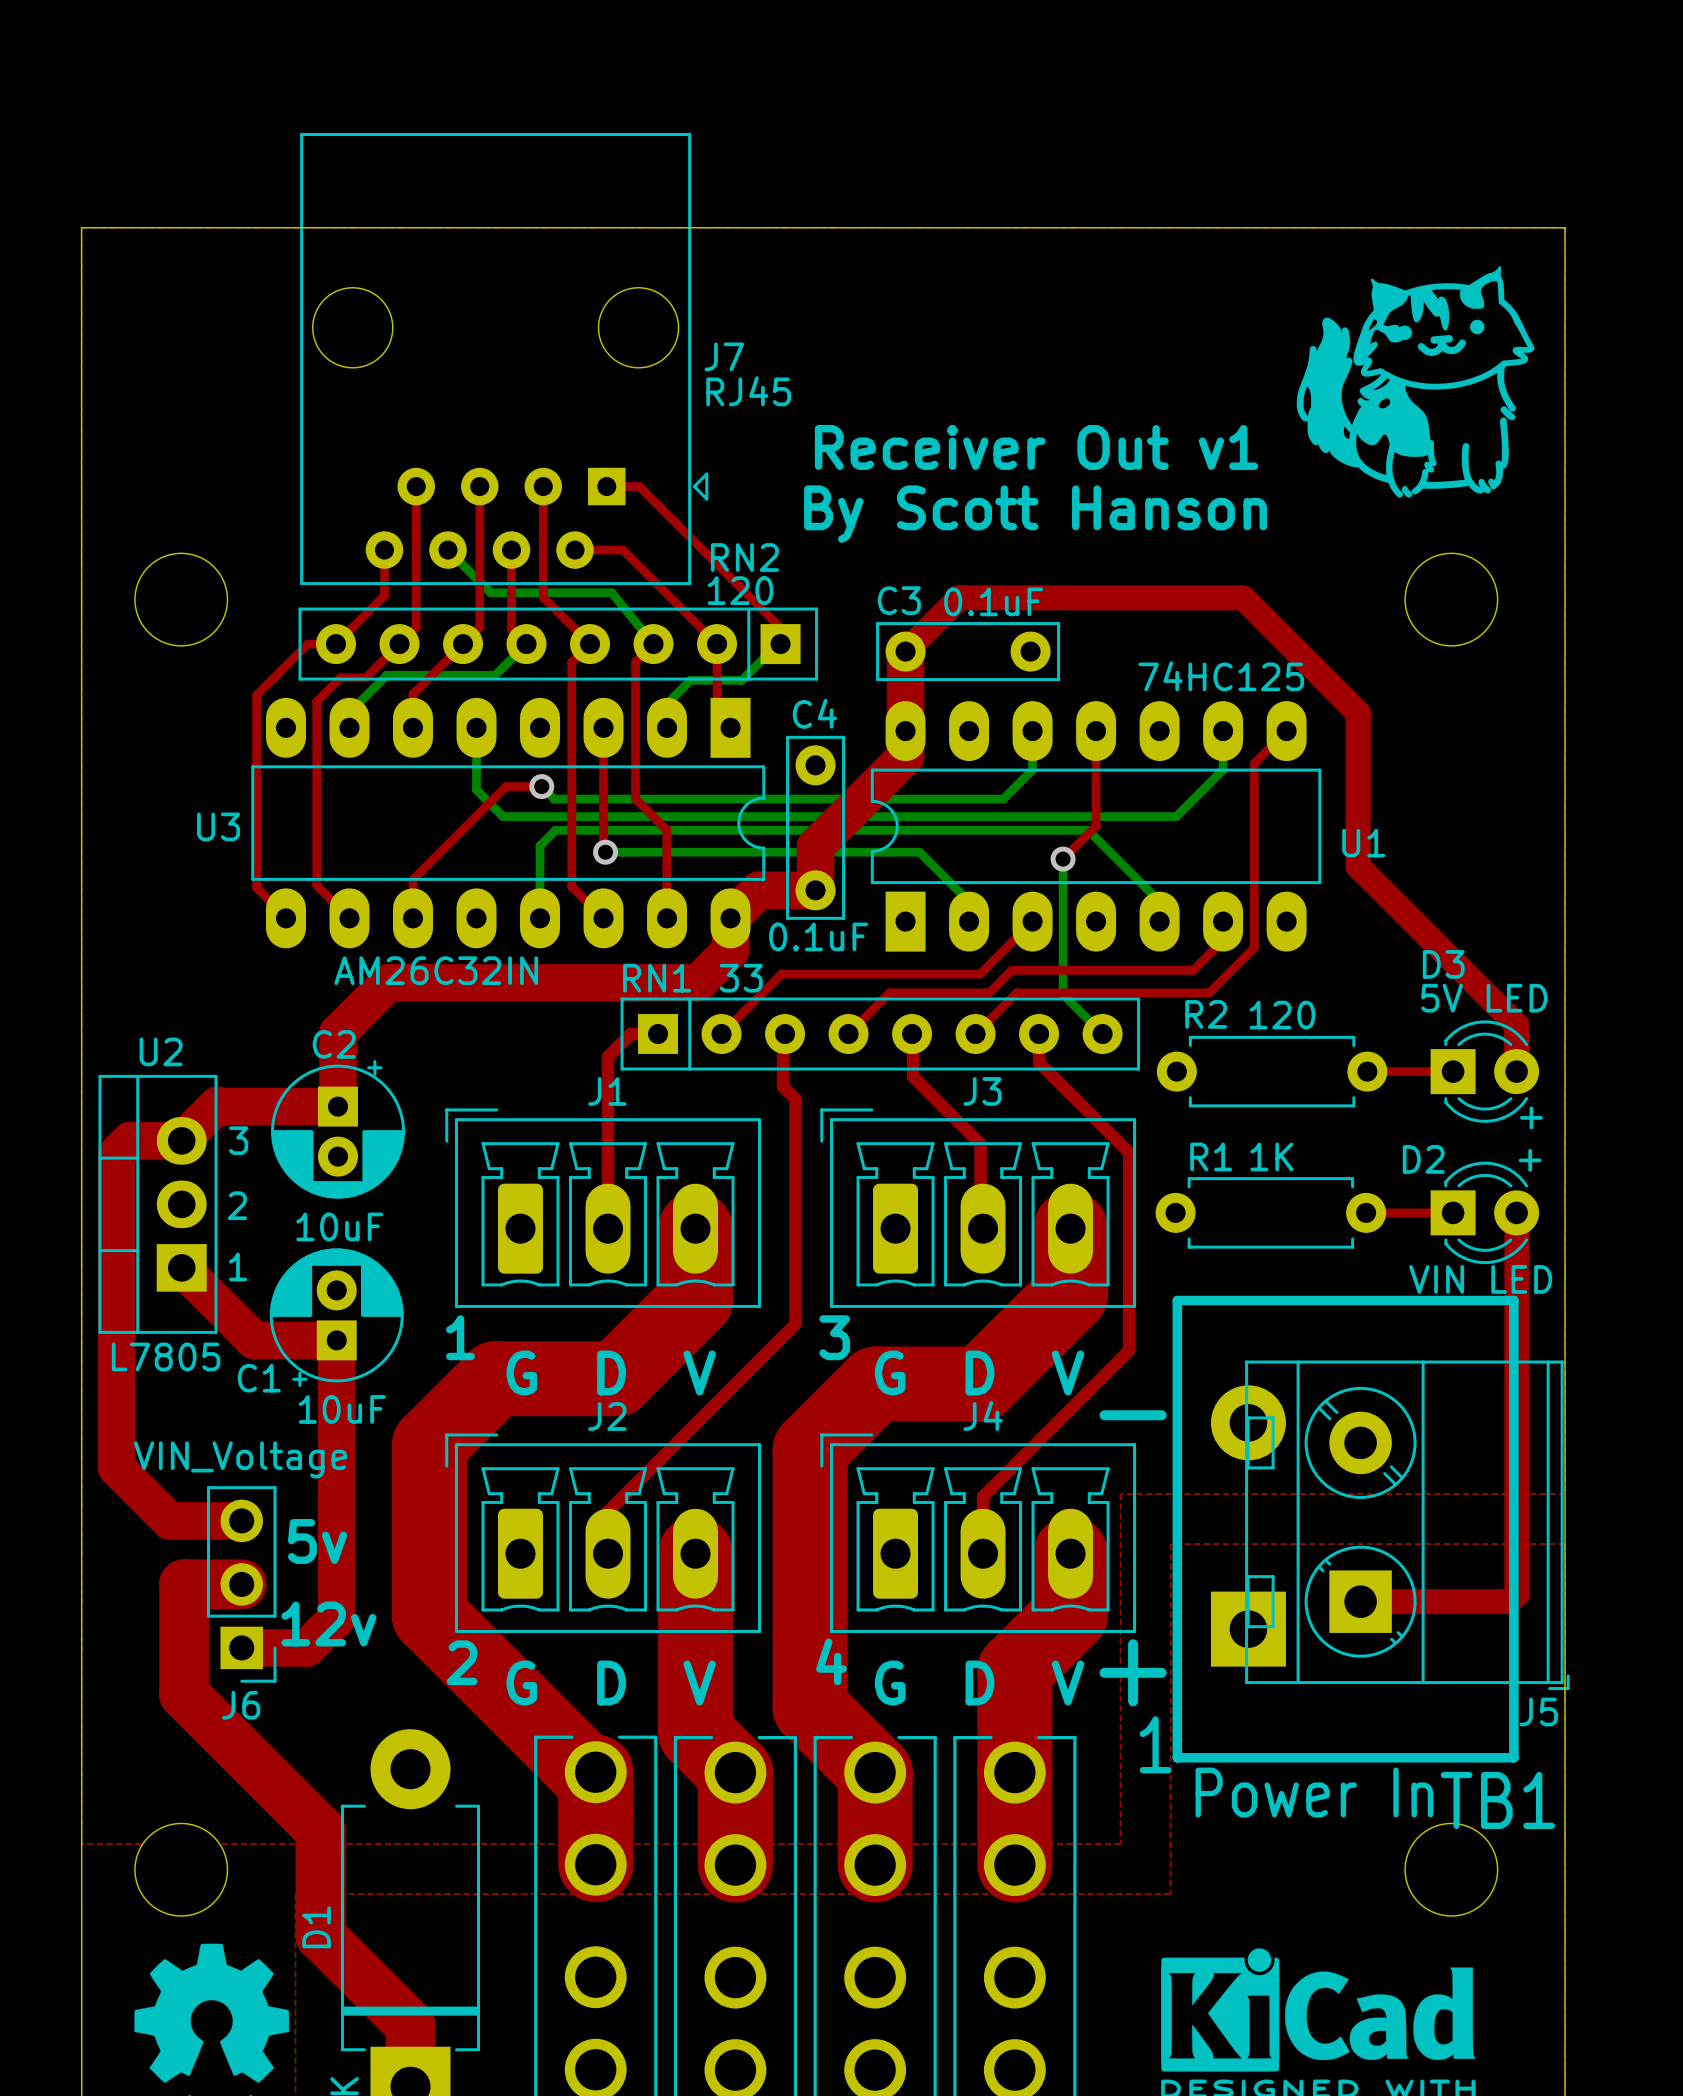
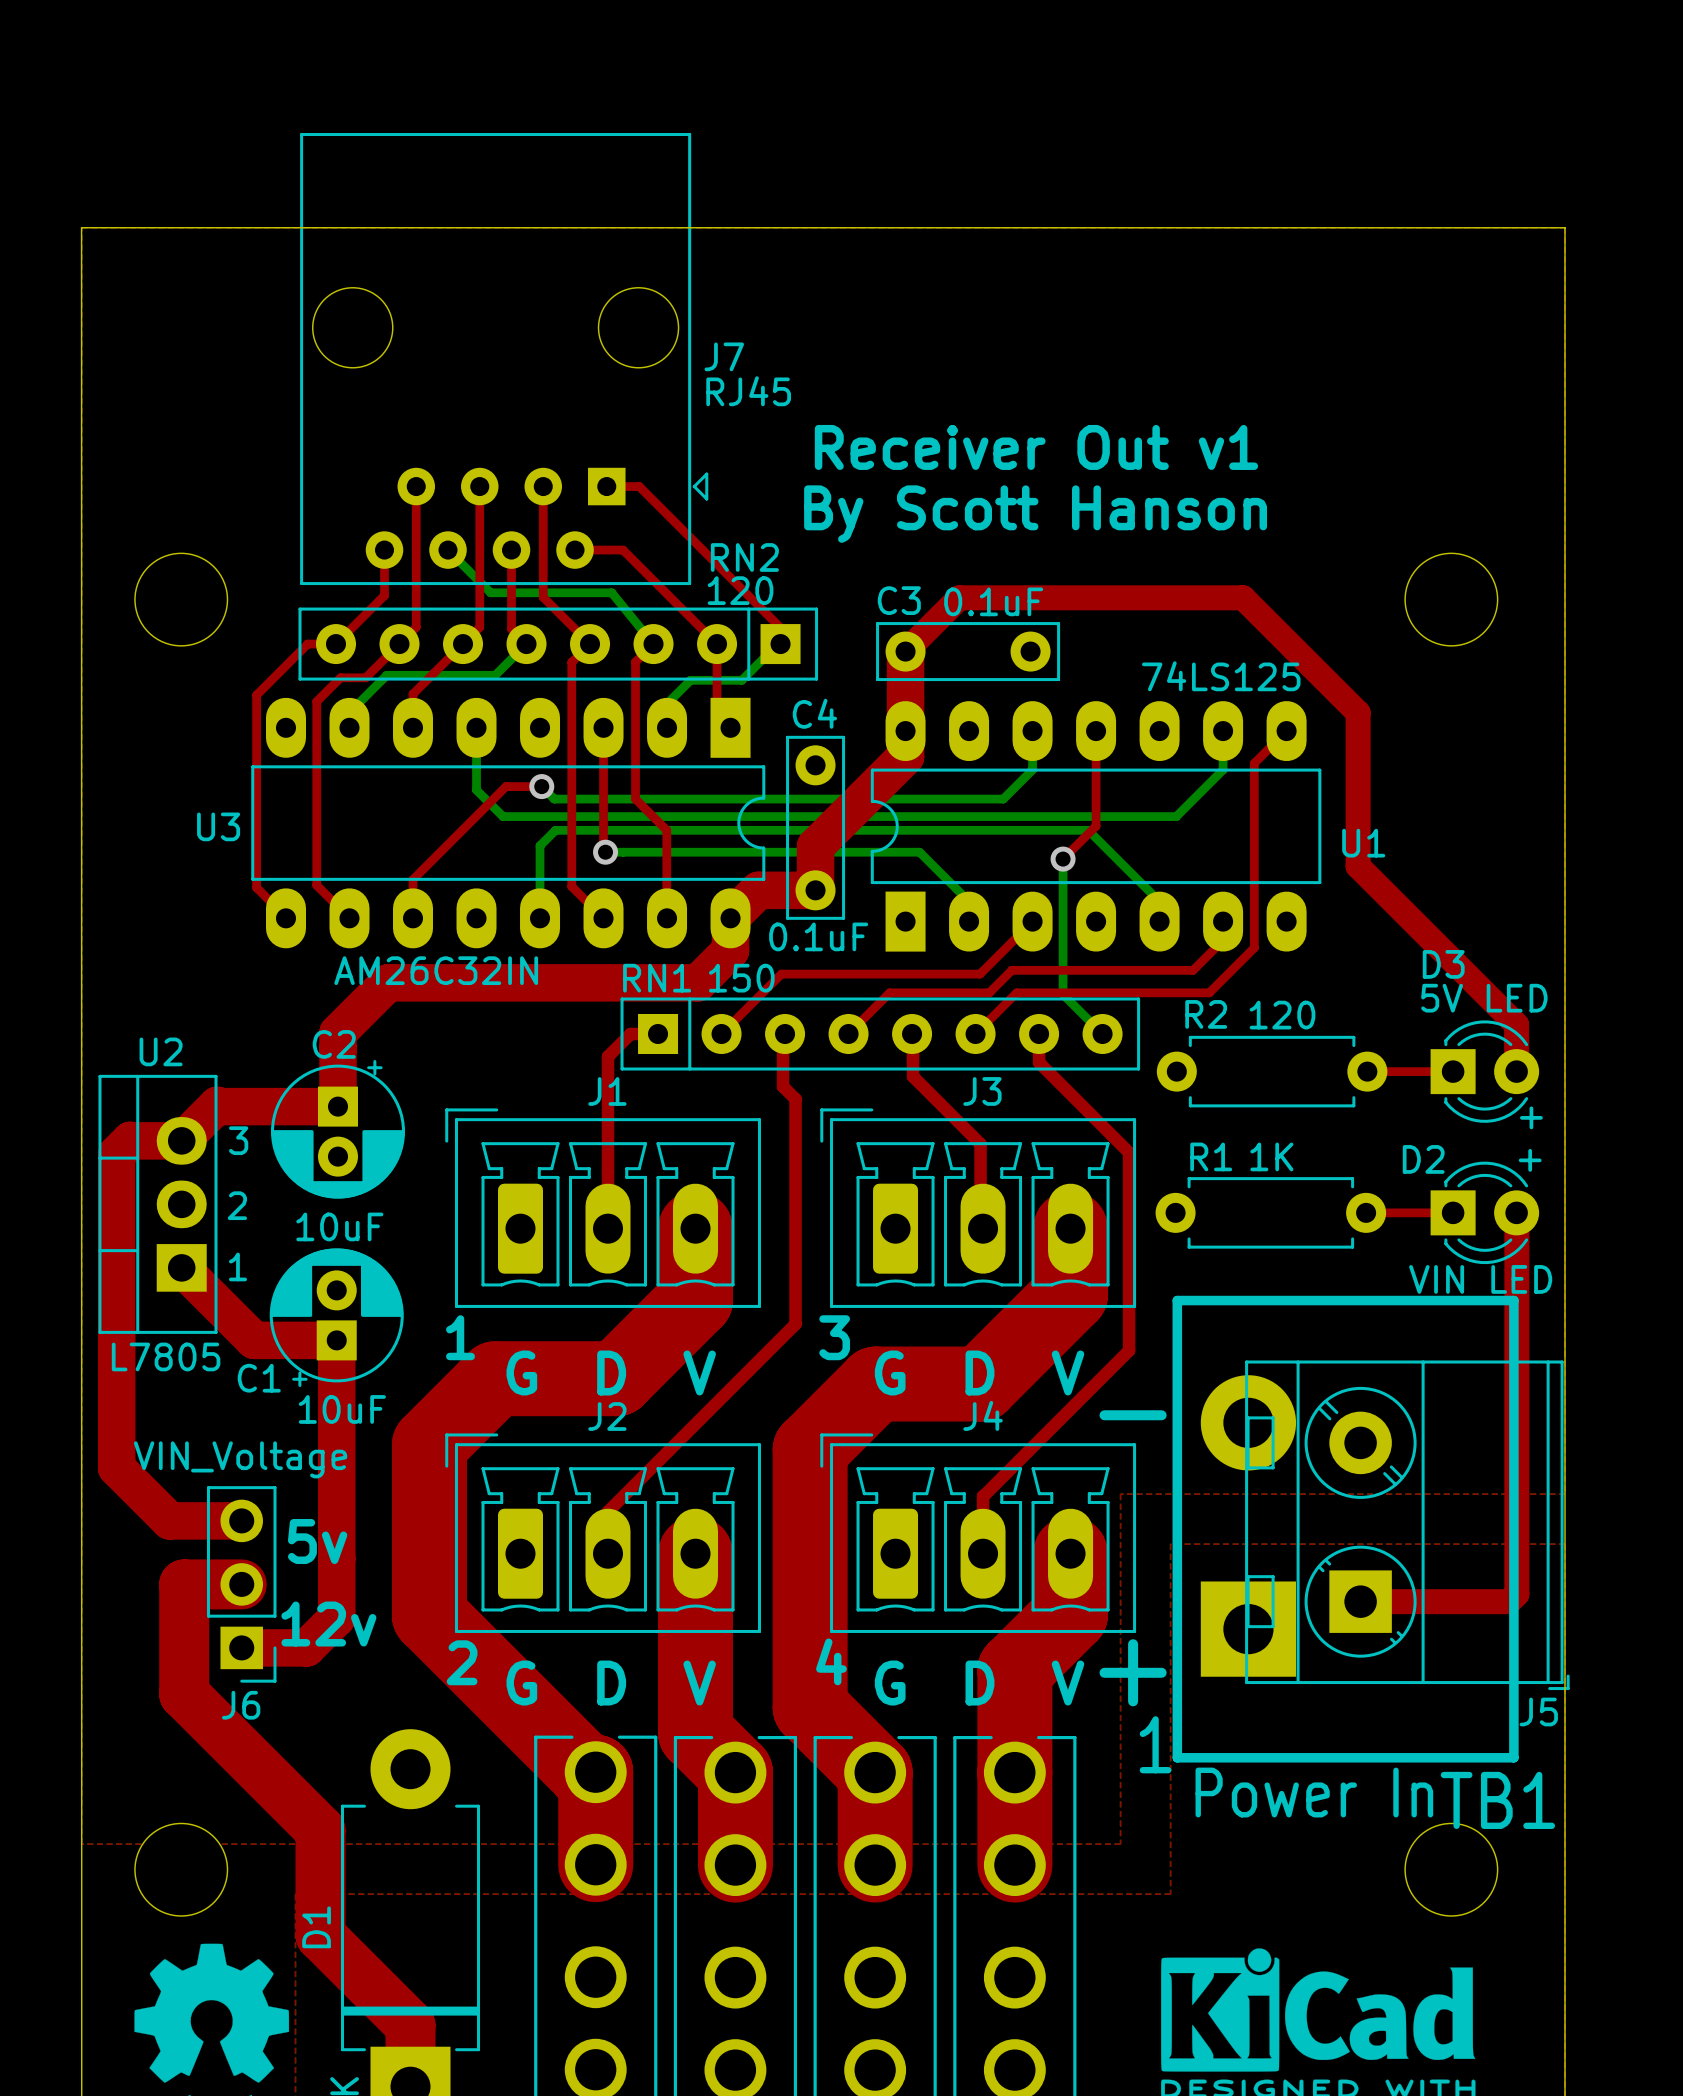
drawing: [1296, 266, 1535, 498] -> none
U1 value: 74HC125 (1221, 676) -> 74LS125 (1221, 676)
RN1 value: 33 (741, 978) -> 150 (741, 978)
TB1 footprint: [1172, 1295, 1519, 1763] -> [1172, 1295, 1519, 1763]

